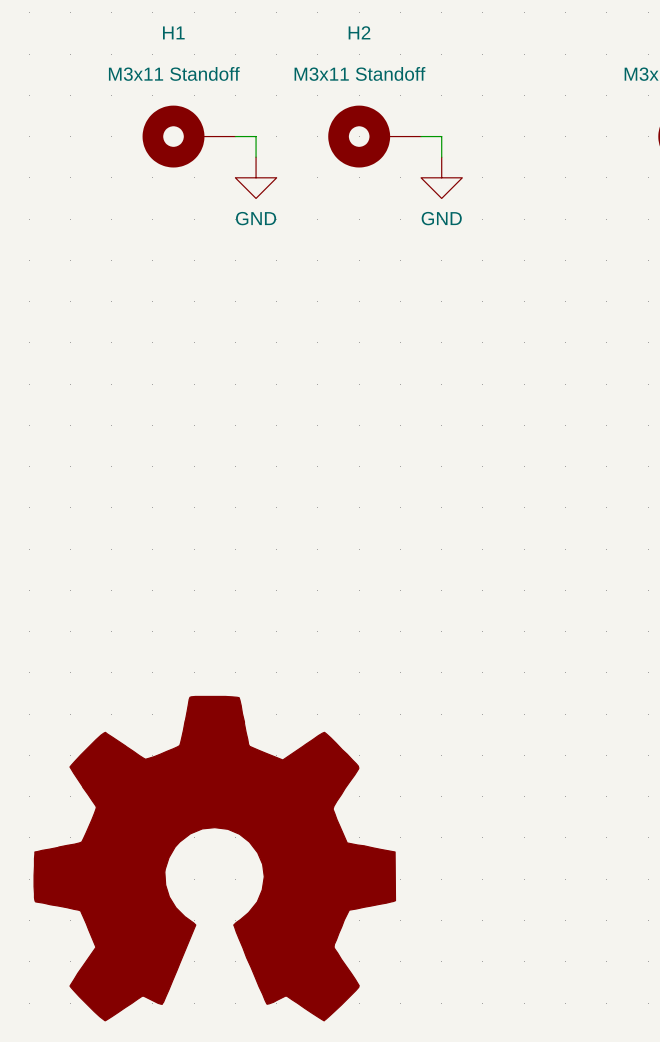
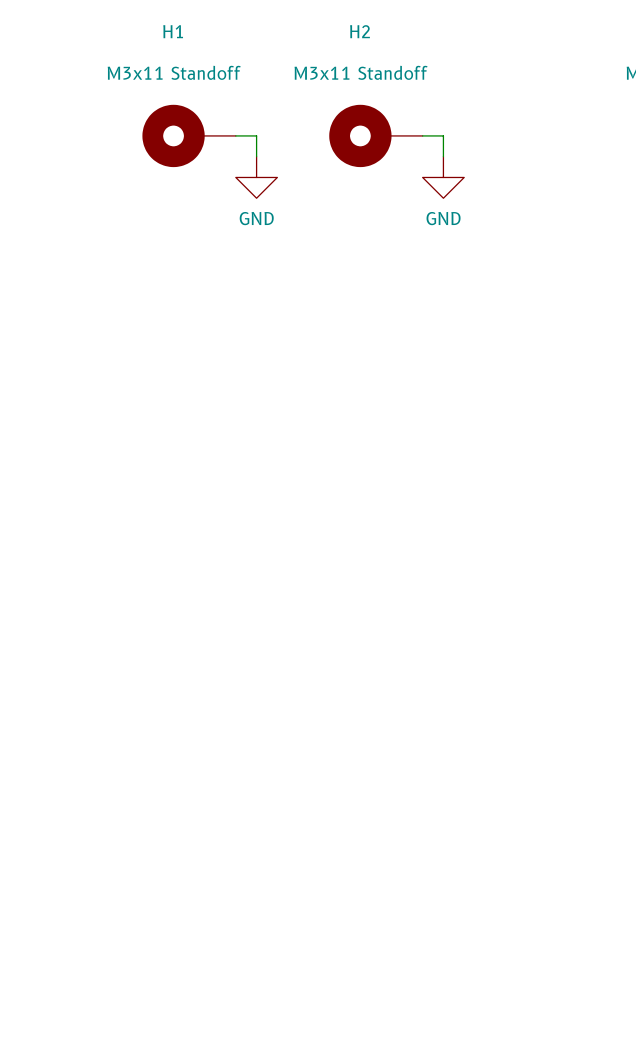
part: (214, 858) -> none

